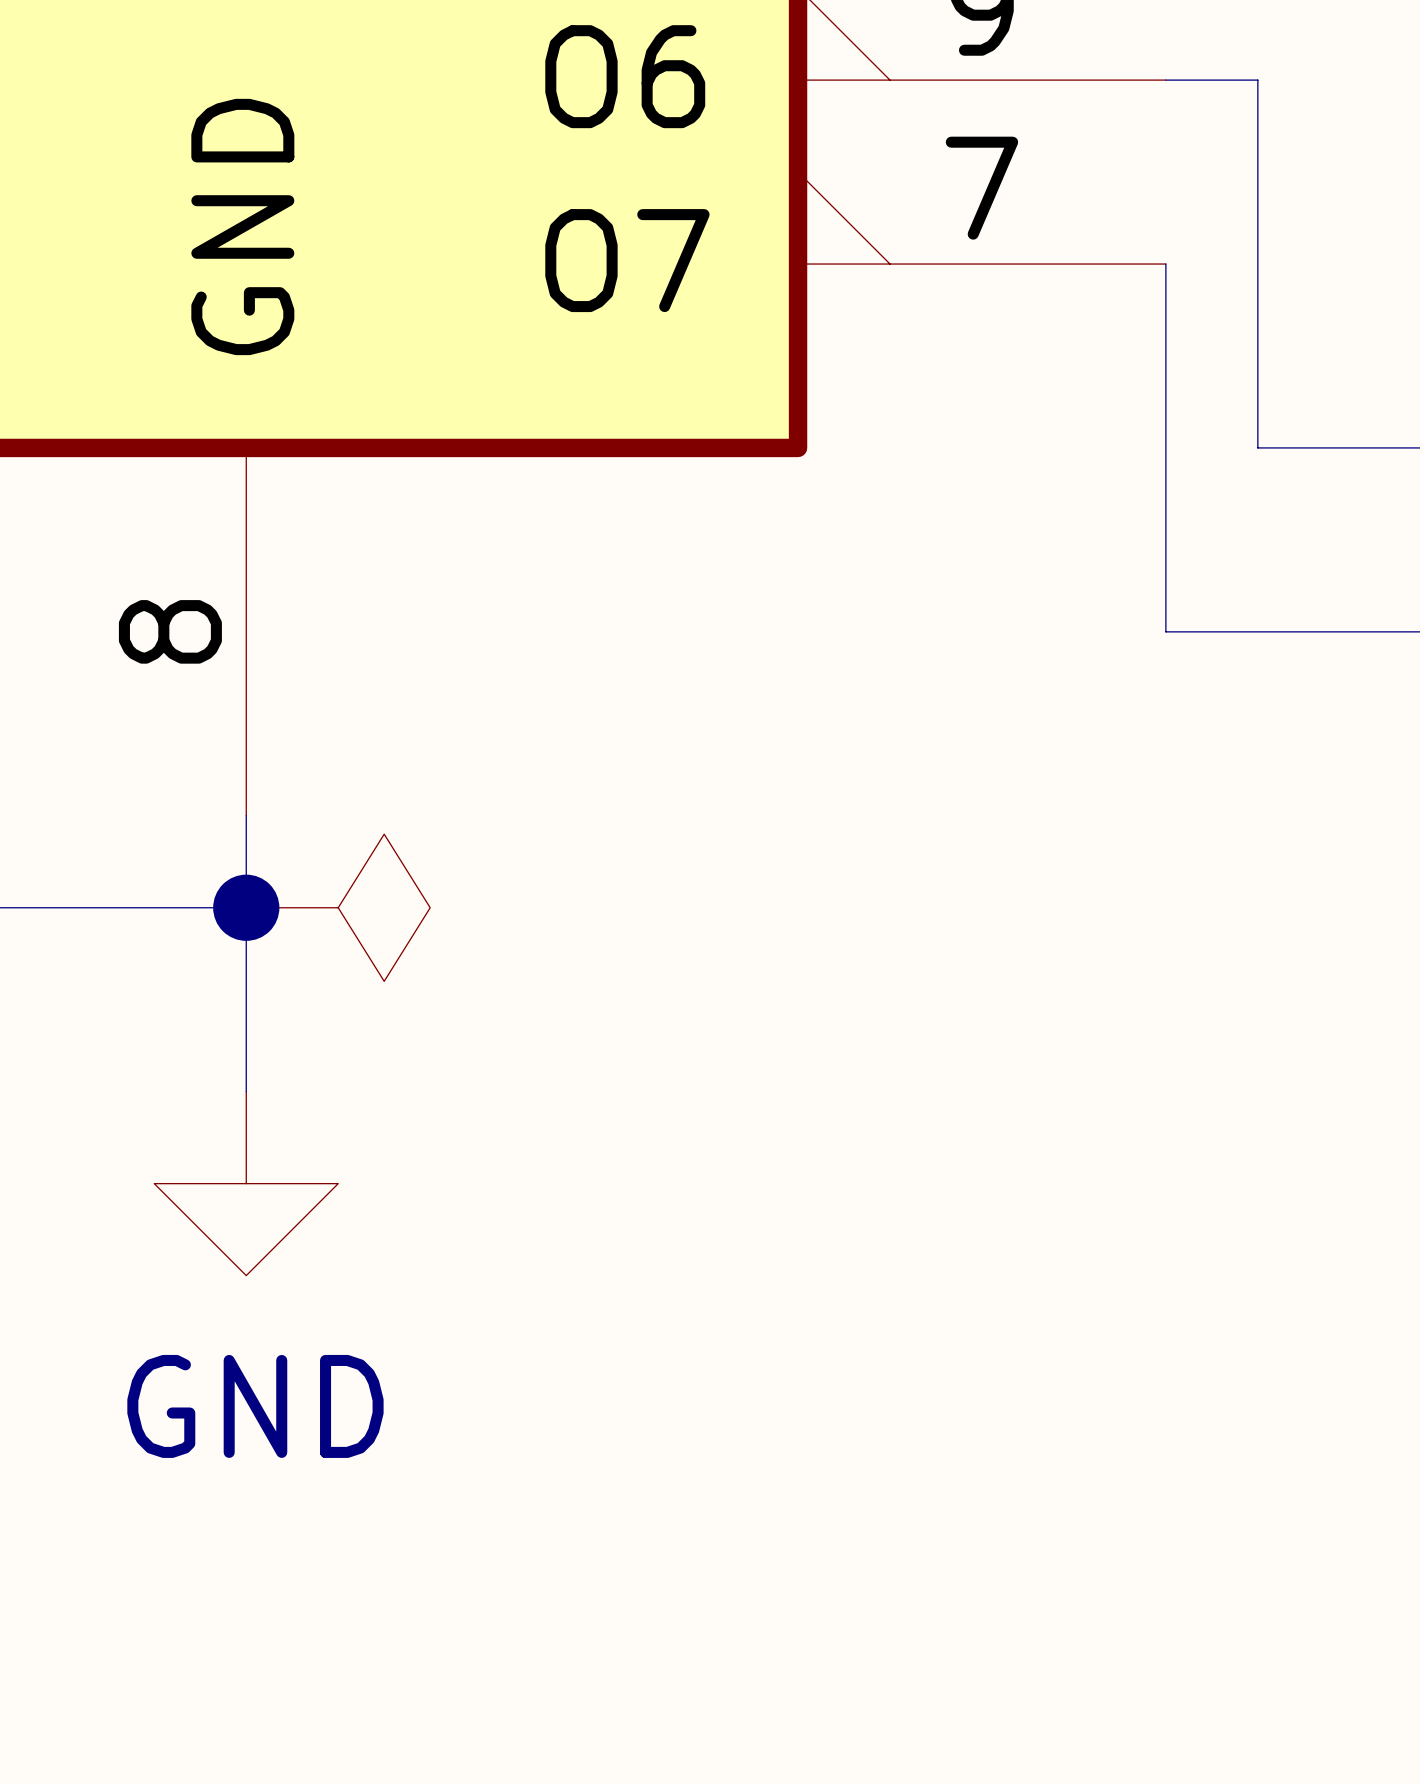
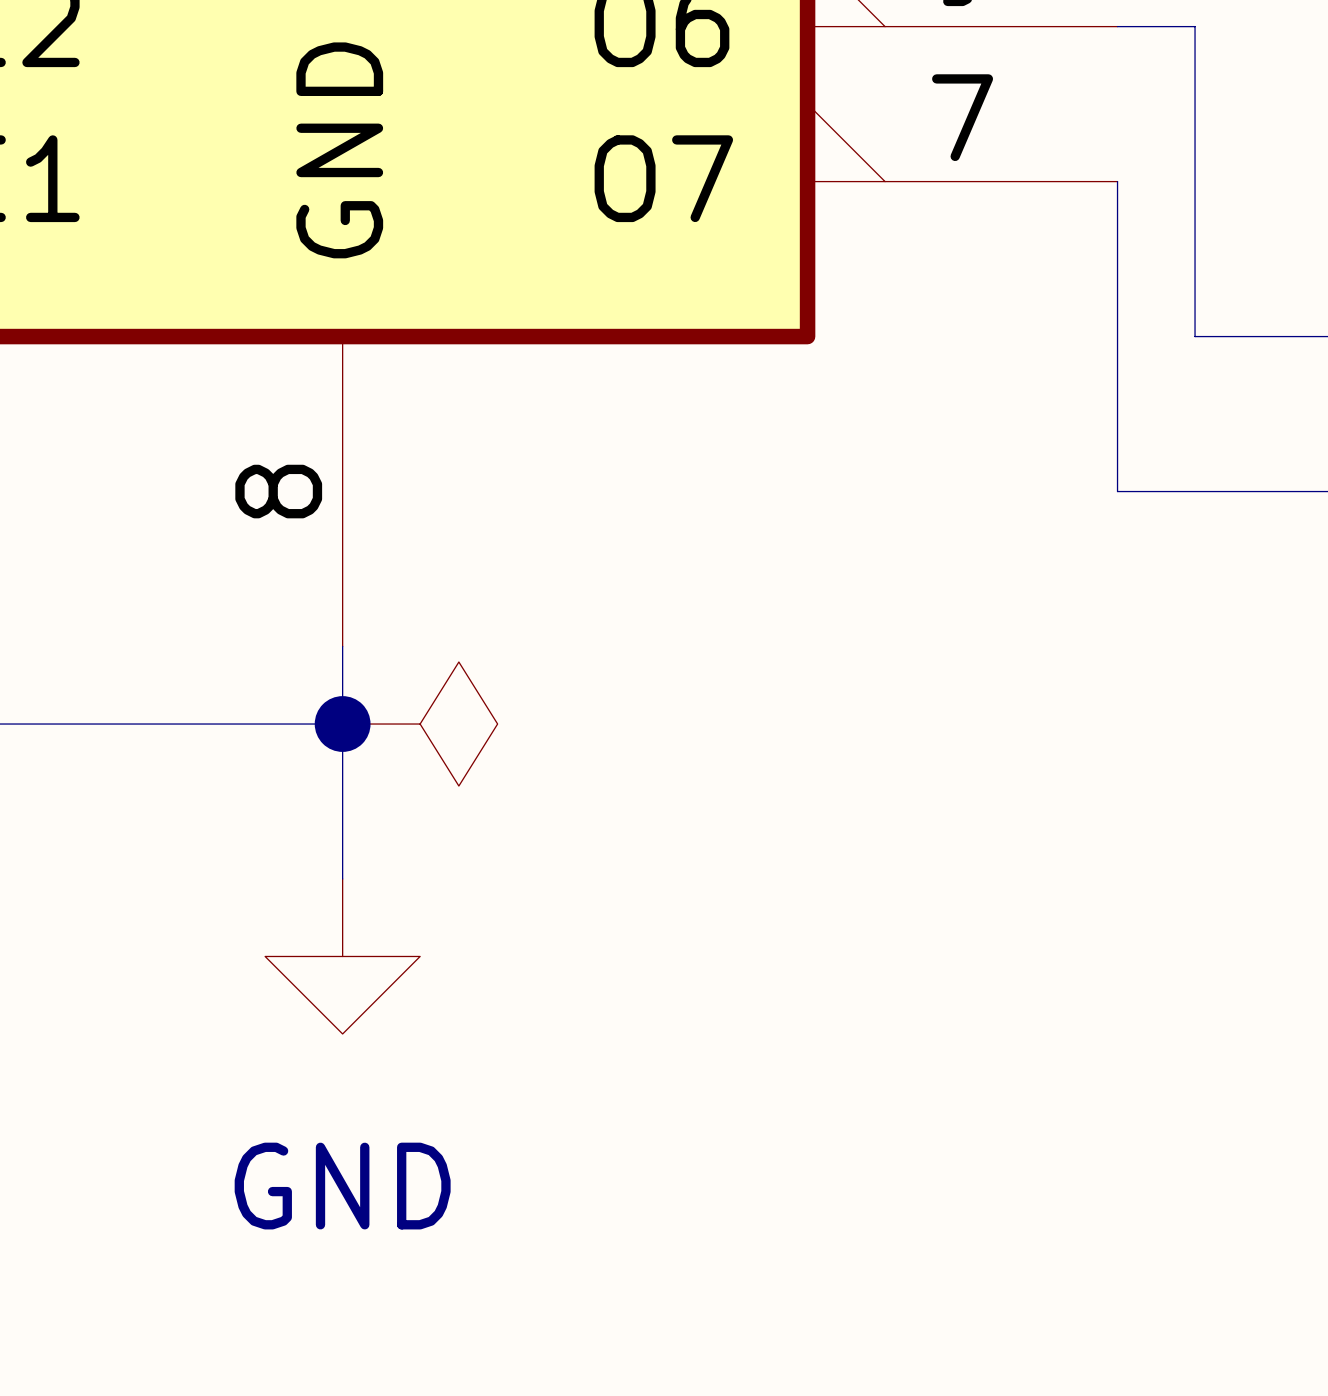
power symbol text position: GND (255, 1406) -> GND (342, 1186)

